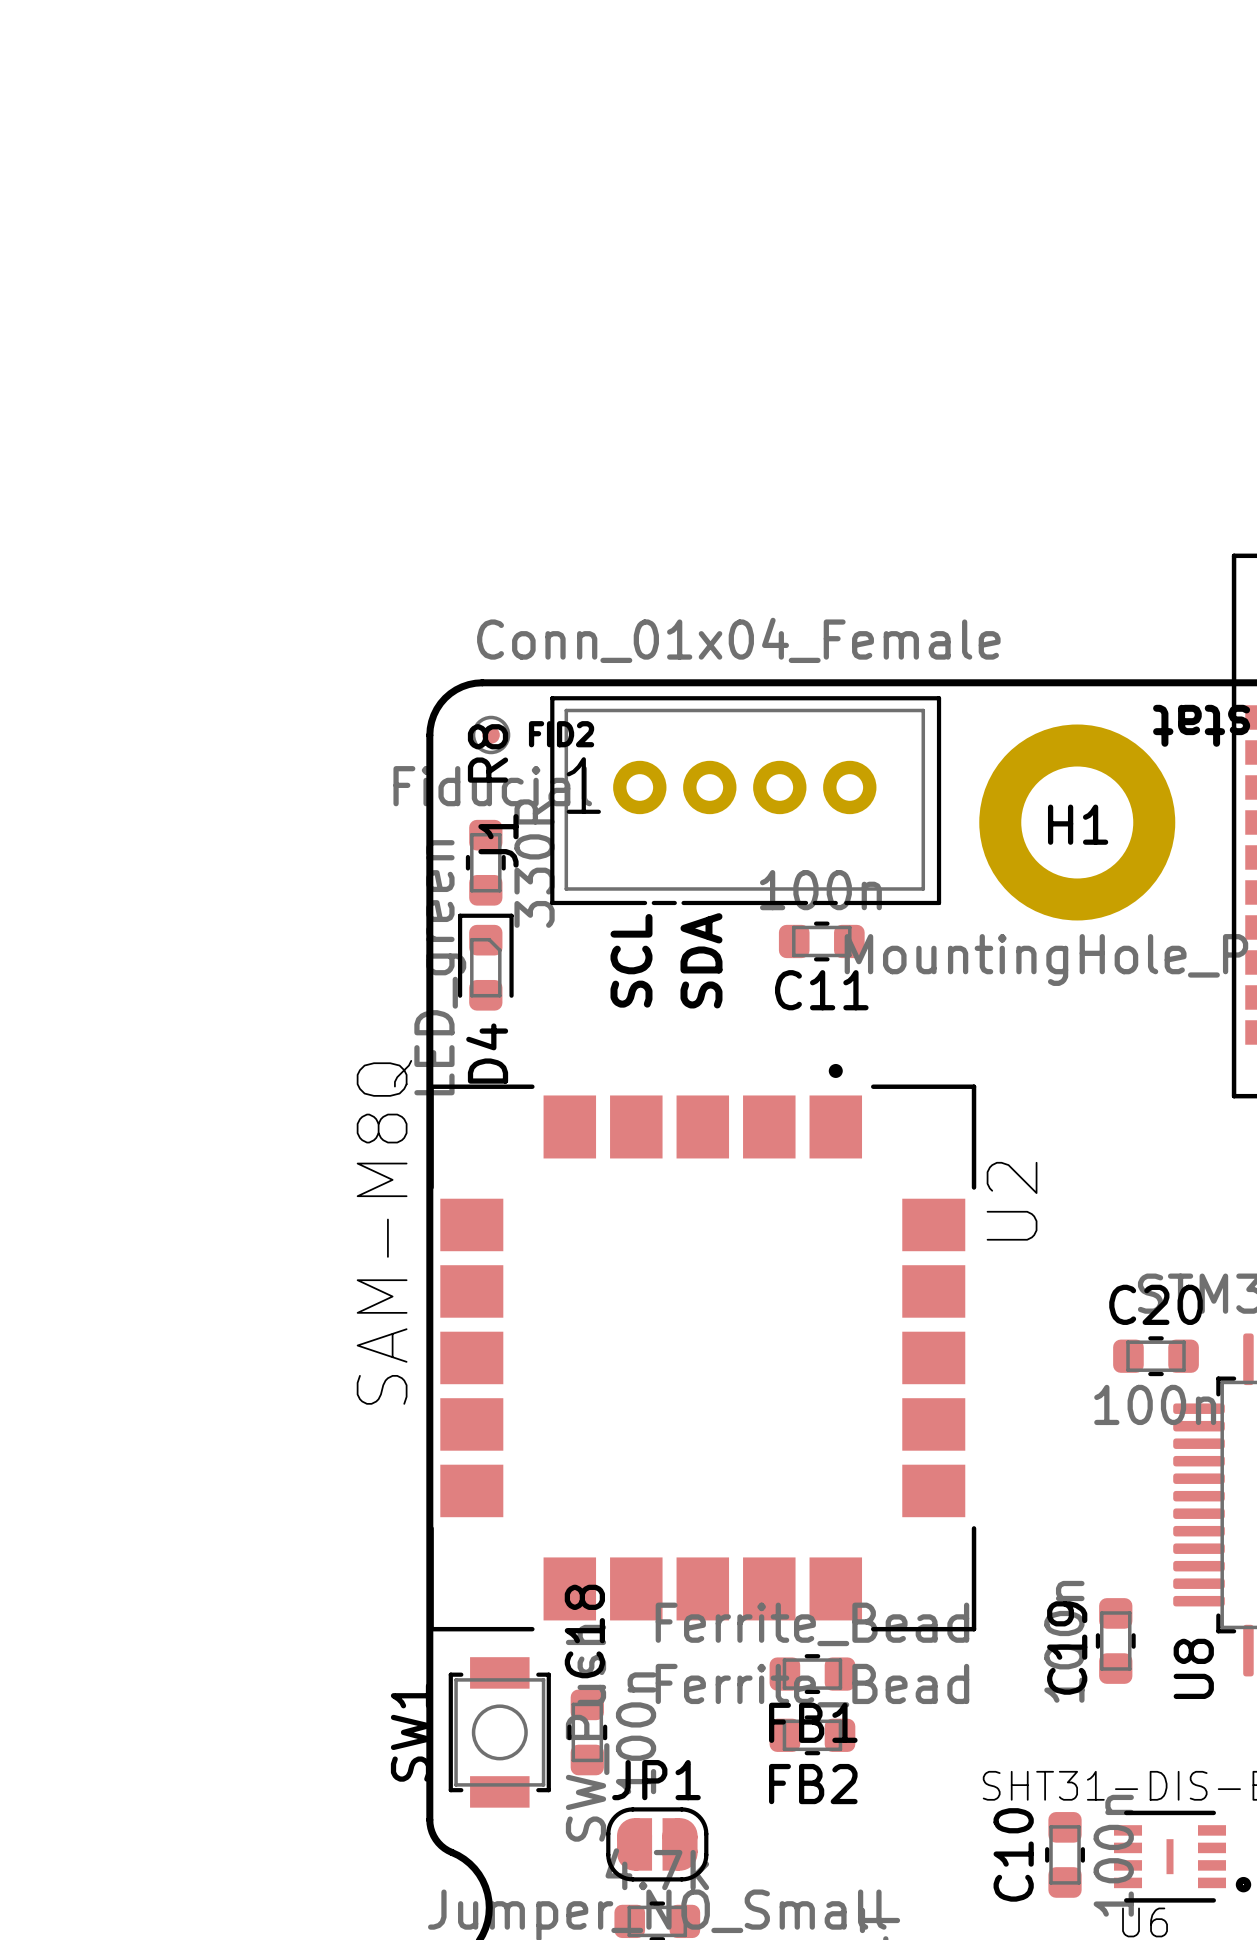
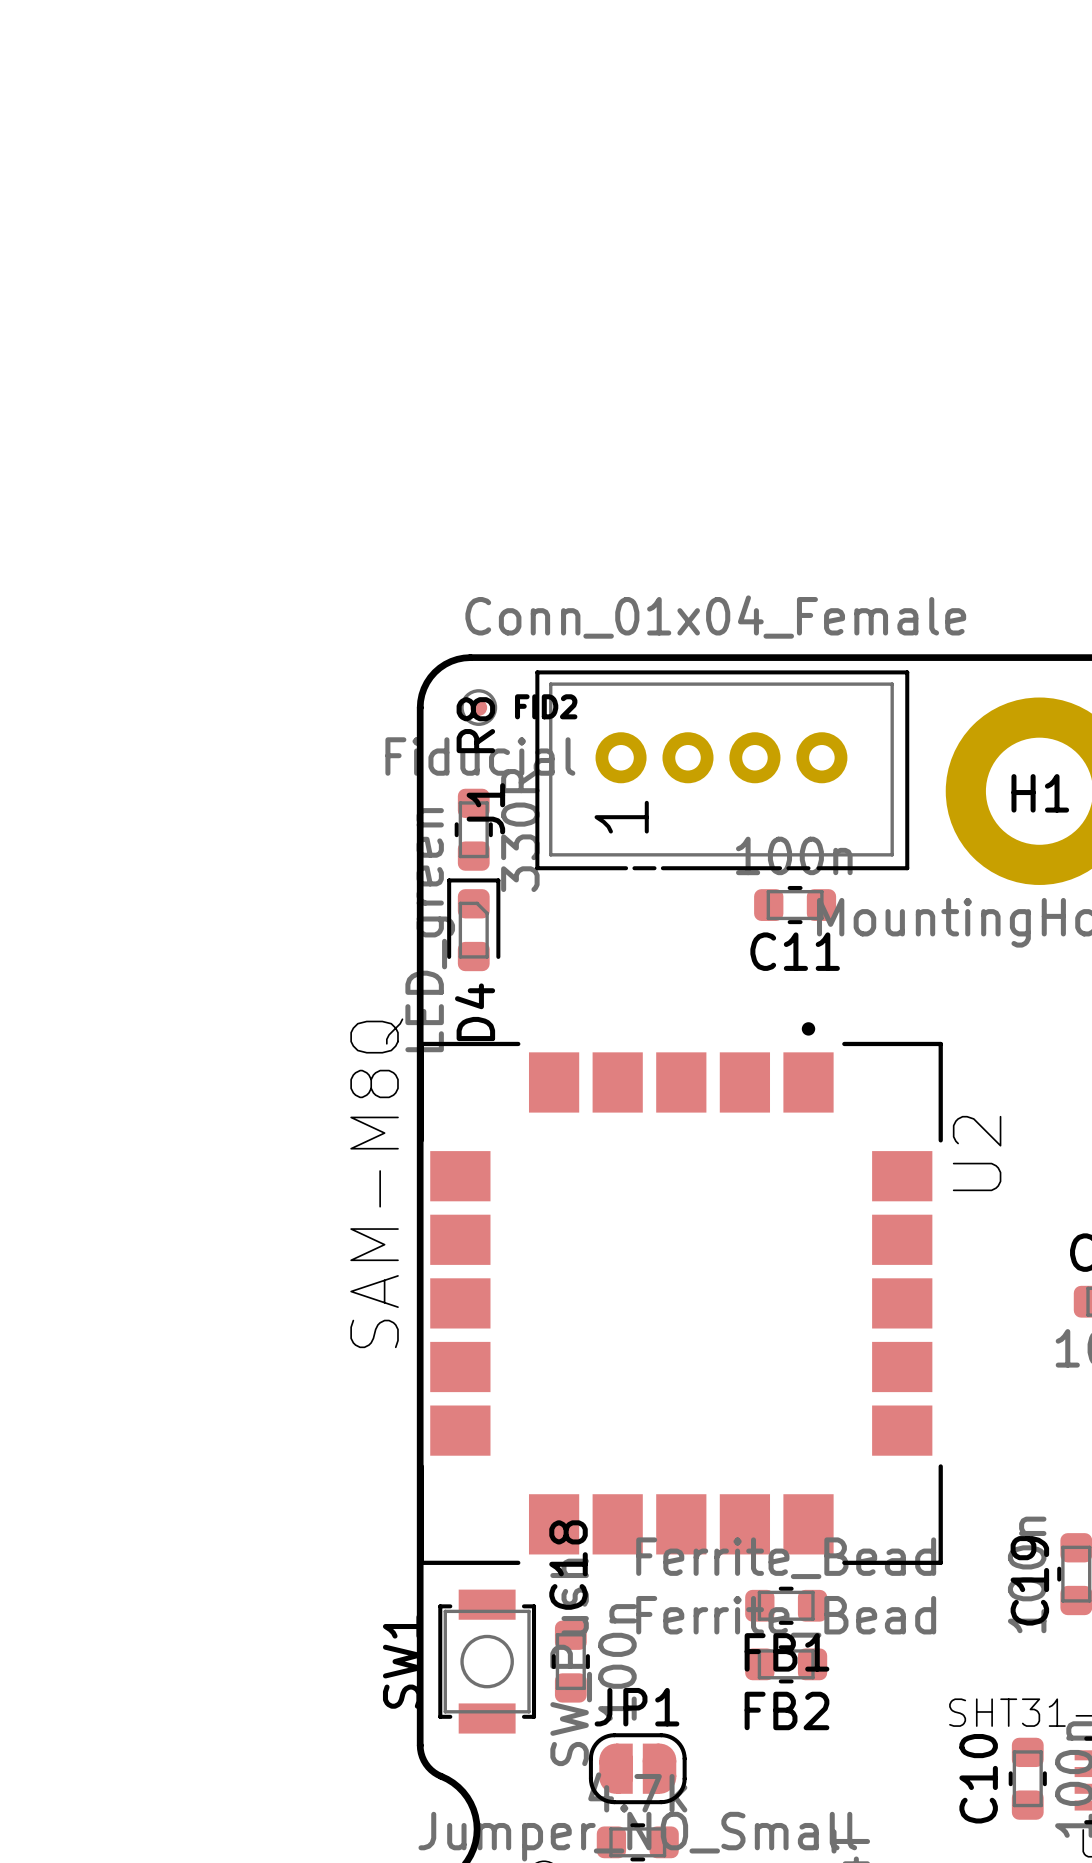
J1 text rotation: 0° (583, 785) -> 90° counterclockwise (621, 817)
text: SCL (631, 960) -> none
text: SDA (701, 960) -> none

